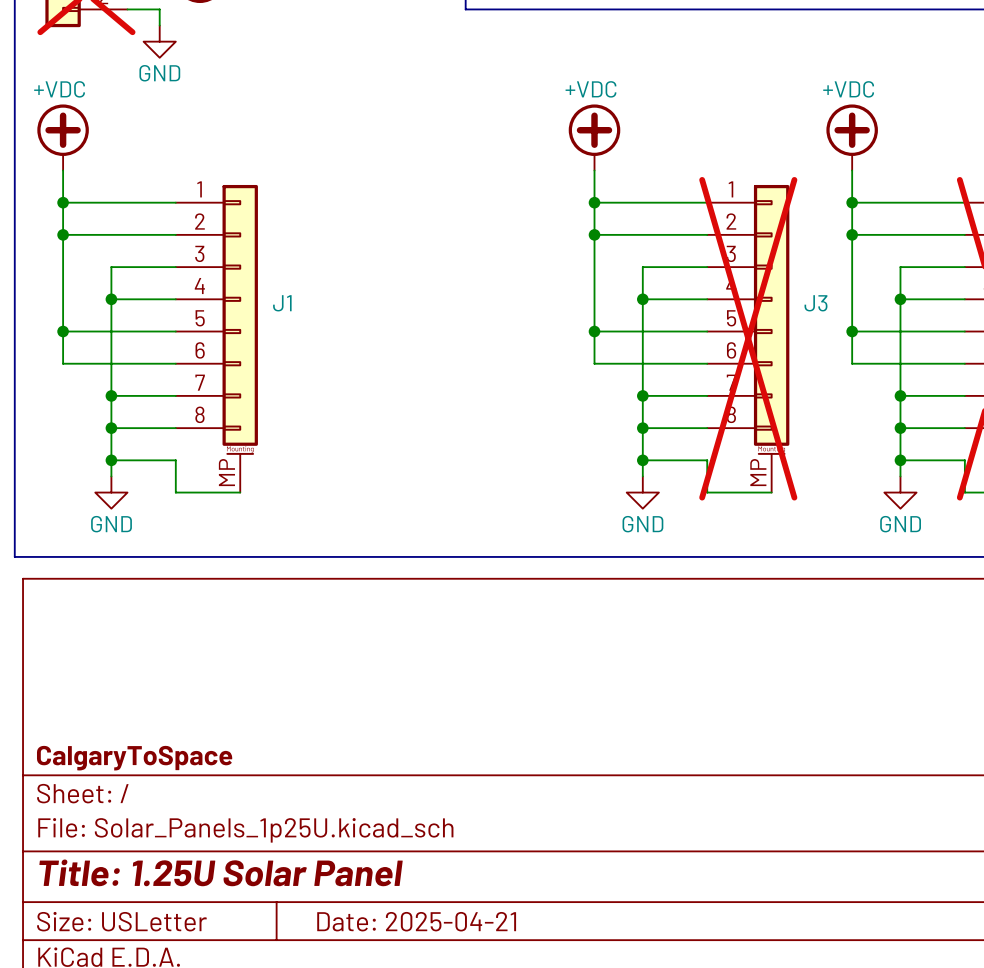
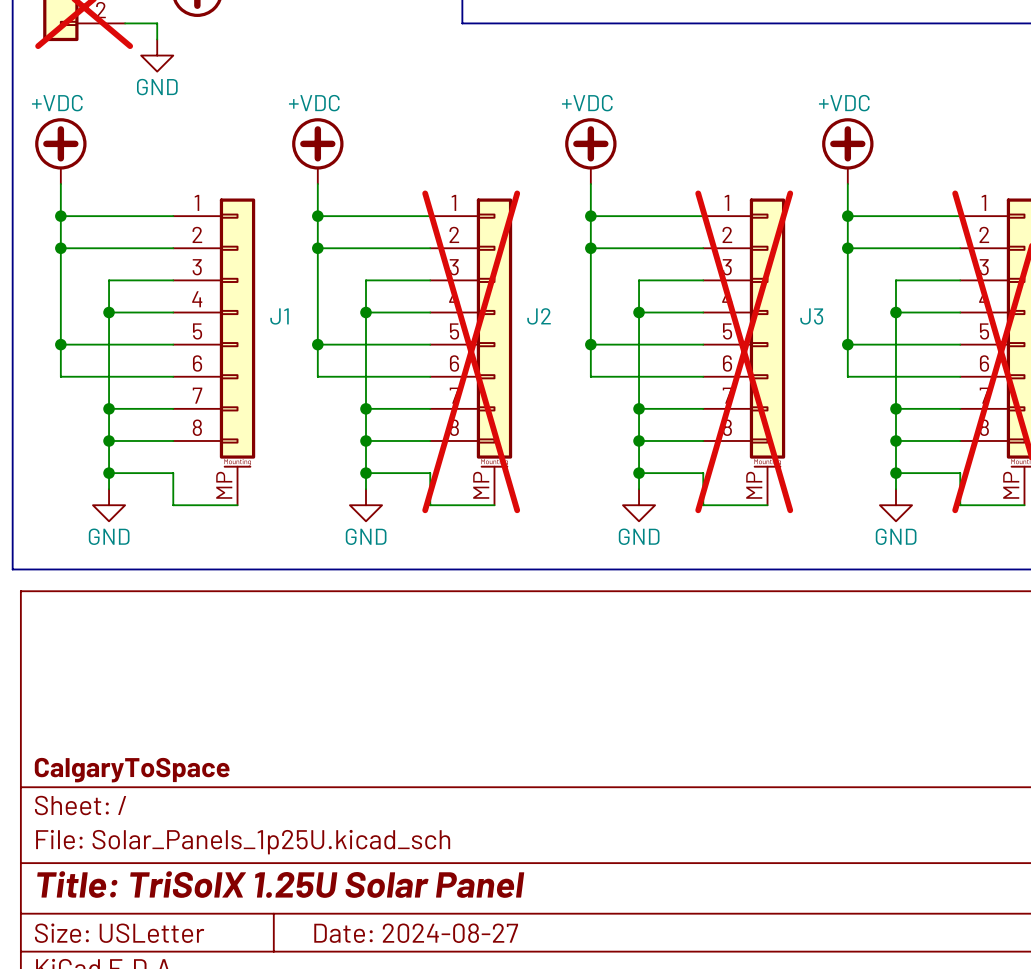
power symbol: none -> +VDC (317, 151)
wire: none -> (317, 184) (317, 376) (430, 376)
wire: none -> (317, 216) (430, 216)
junction: none -> (317, 216)
wire: none -> (317, 248) (430, 248)
junction: none -> (317, 248)
wire: none -> (430, 280) (366, 280) (366, 489)
wire: none -> (366, 312) (430, 312)
junction: none -> (366, 312)
wire: none -> (317, 344) (430, 344)
junction: none -> (317, 344)
J2: none -> (471, 351)
wire: none -> (366, 408) (430, 408)
junction: none -> (366, 408)
wire: none -> (366, 440) (430, 440)
junction: none -> (366, 440)
wire: none -> (366, 473) (430, 473) (430, 505) (494, 505)
junction: none -> (366, 473)
power symbol: none -> GND (366, 505)
title block: Title: 1.25U Solar Panel (221, 872) -> Title: TriSolX 1.25U Solar Panel (280, 884)
title block: Date: 2025-04-21 (416, 921) -> Date: 2024-08-27 (416, 933)

